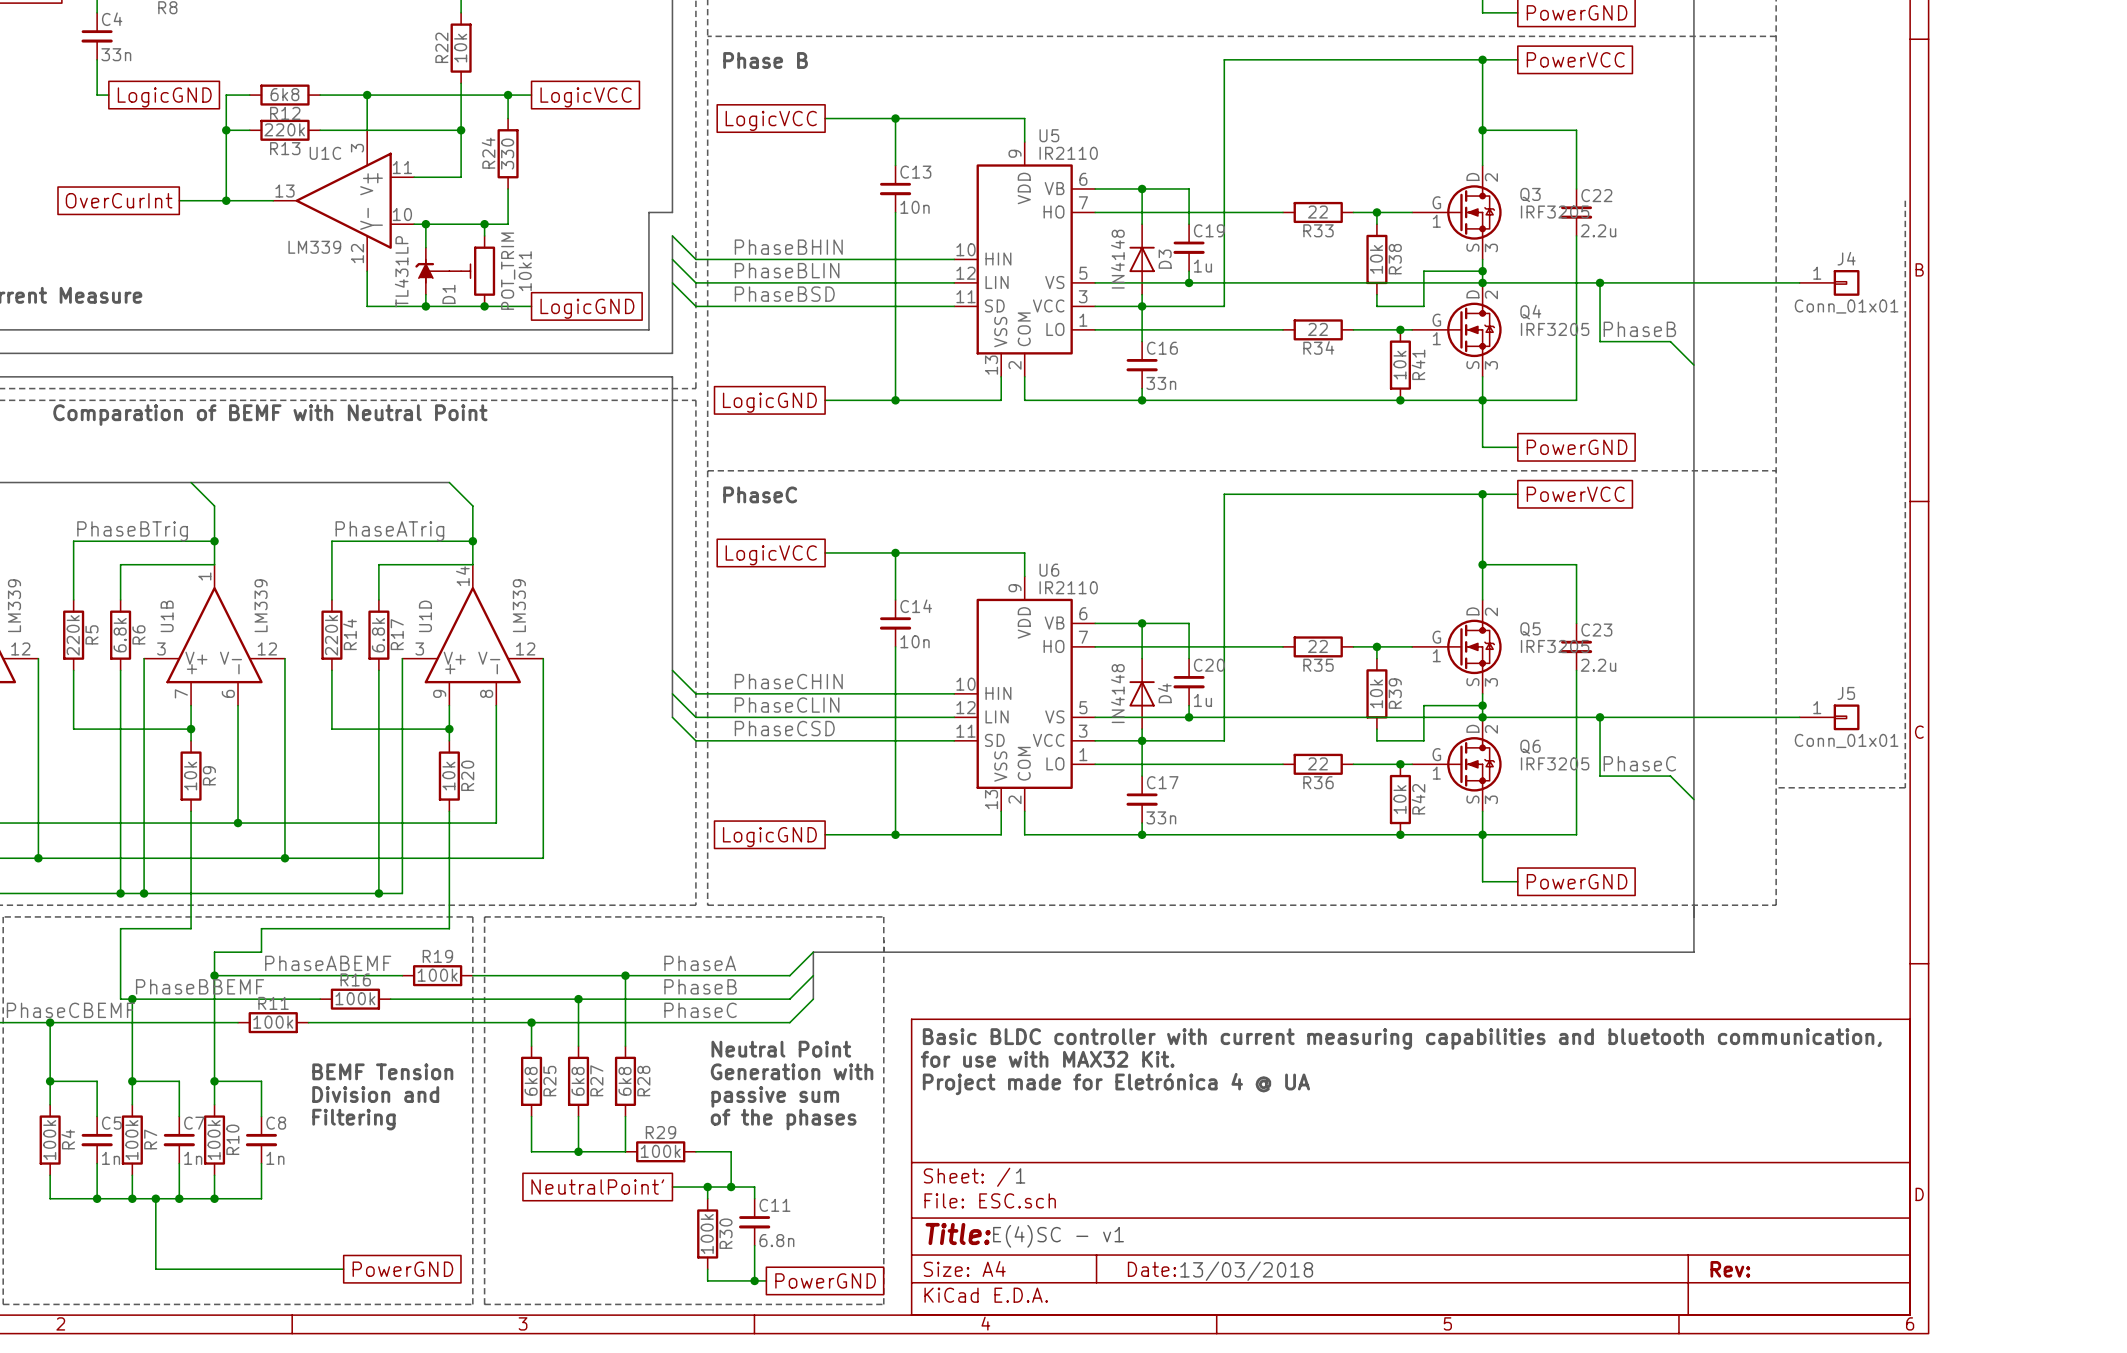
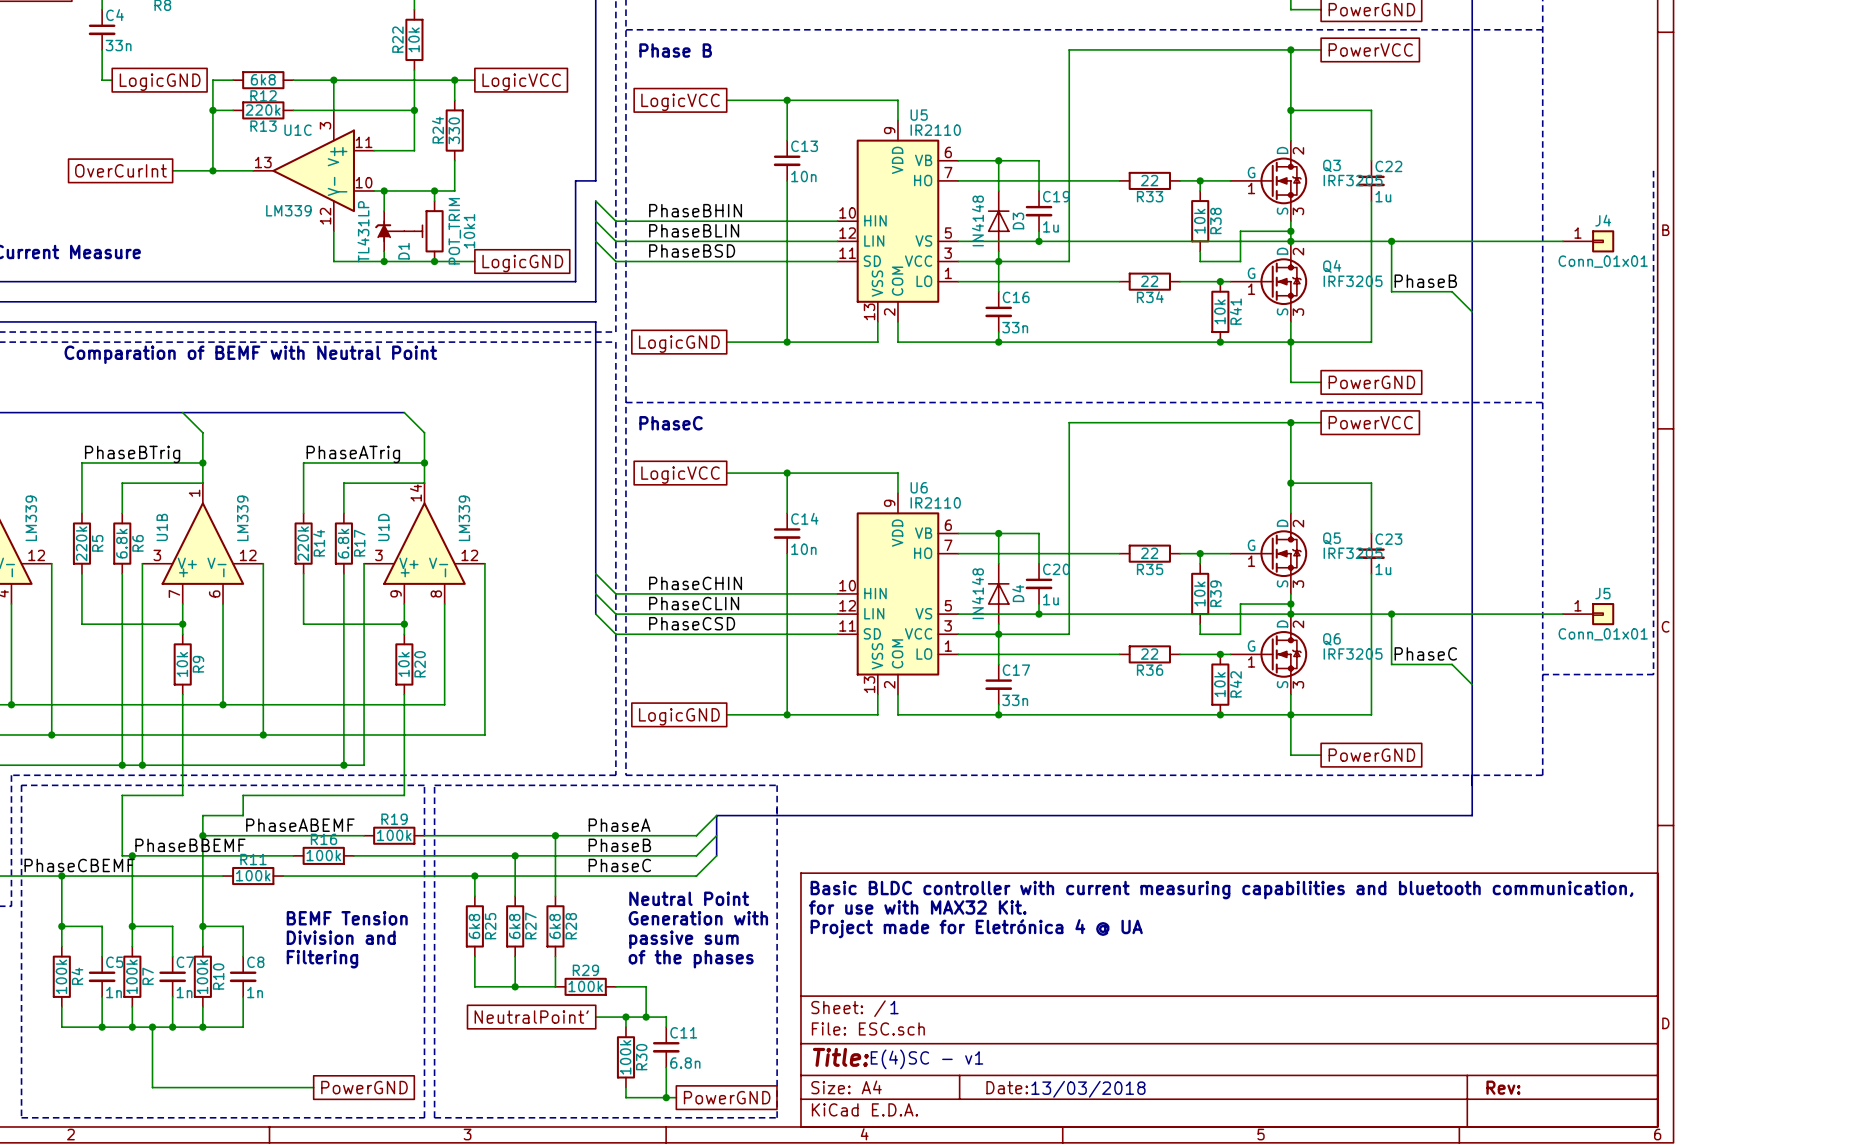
C22 value: 2.2u (1598, 230) -> 1u (1383, 196)
C23 value: 2.2u (1598, 665) -> 1u (1383, 569)

